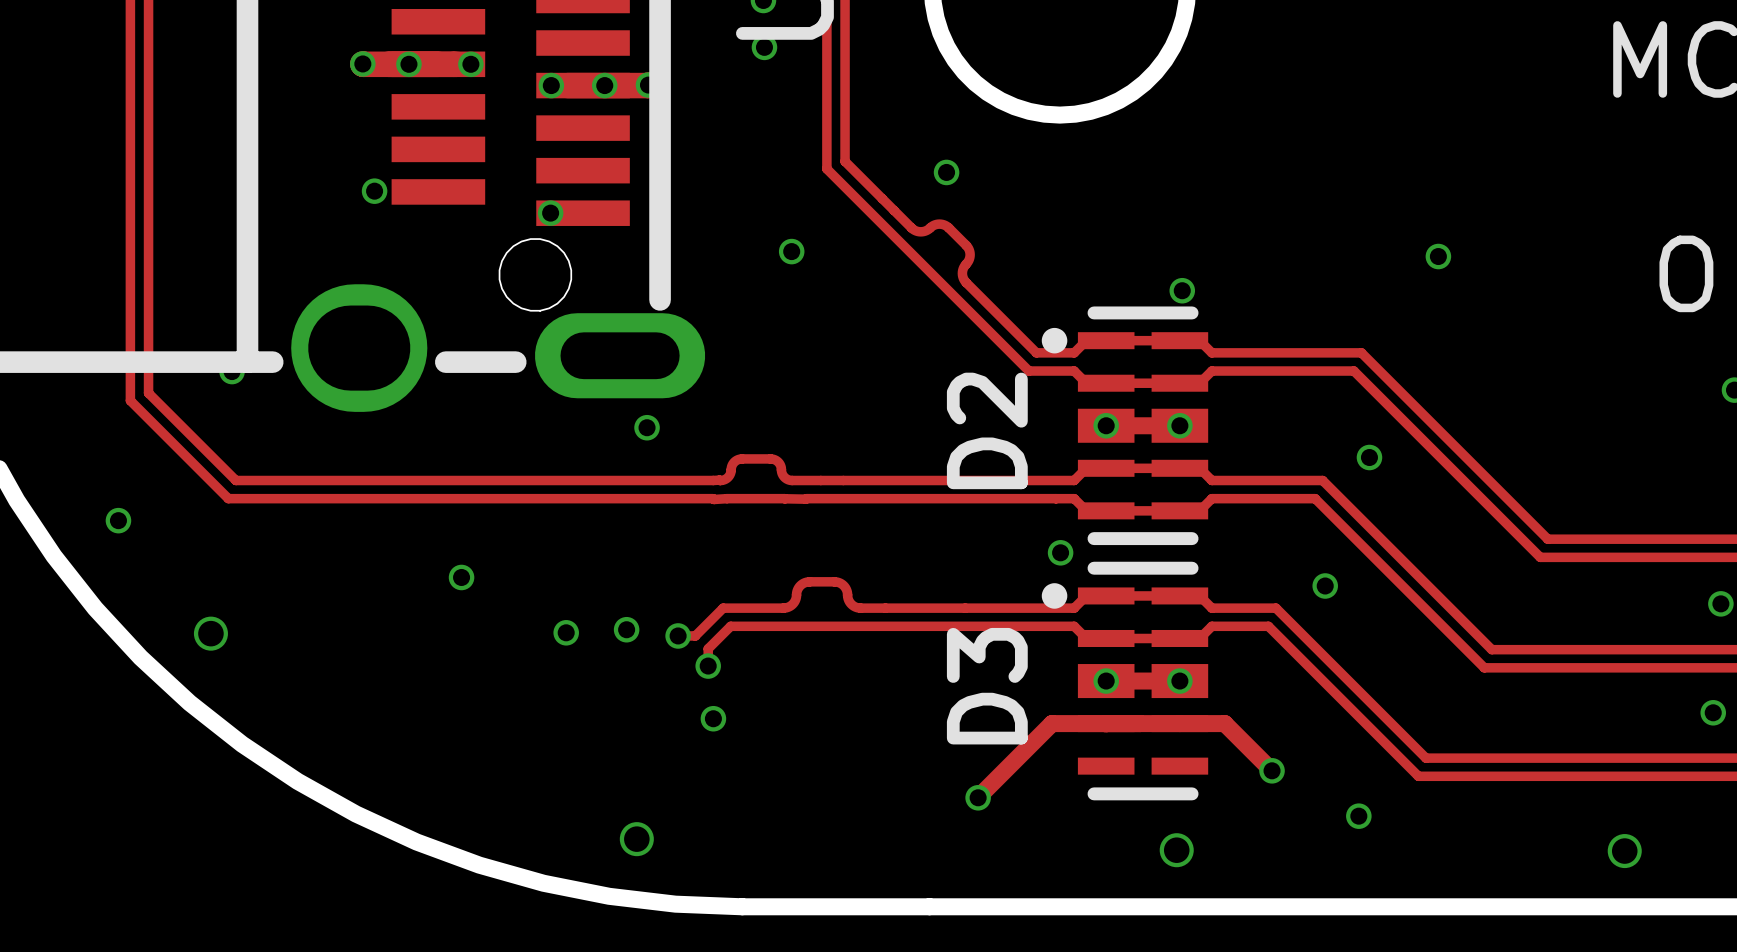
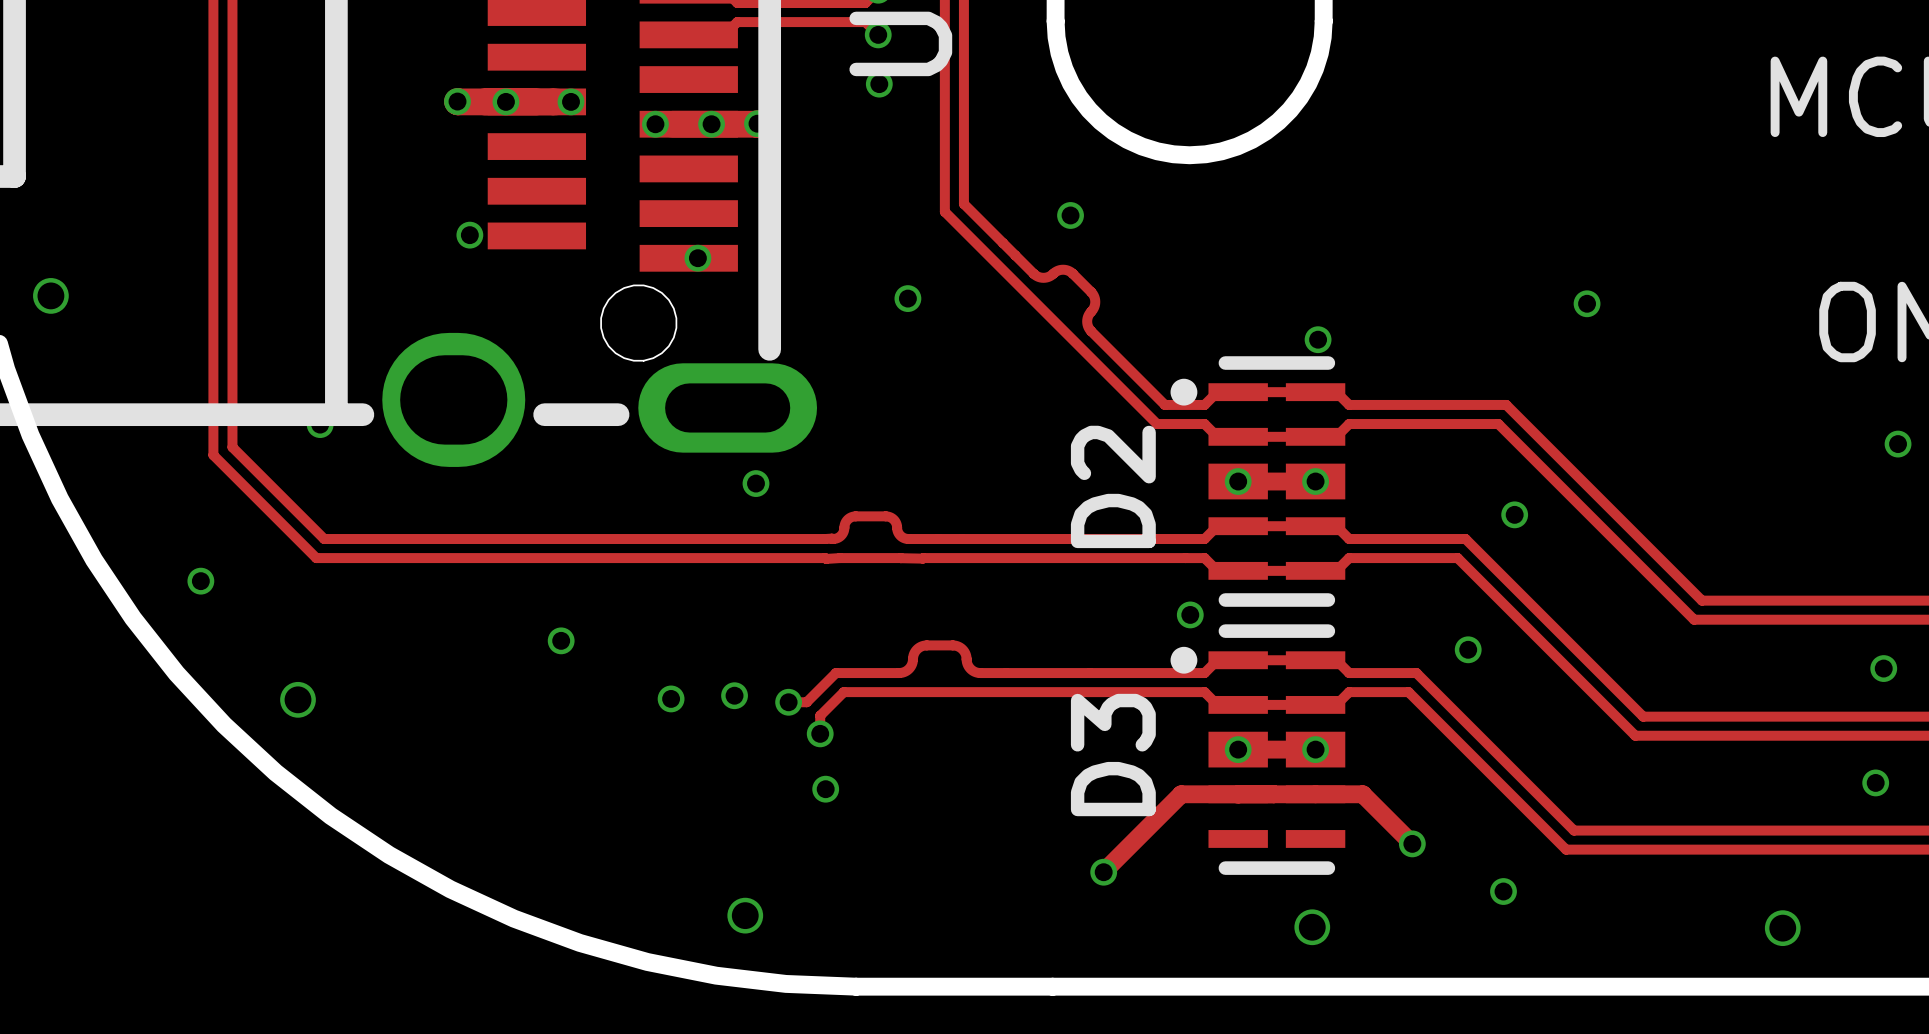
via position: (550, 213) -> (697, 258)

